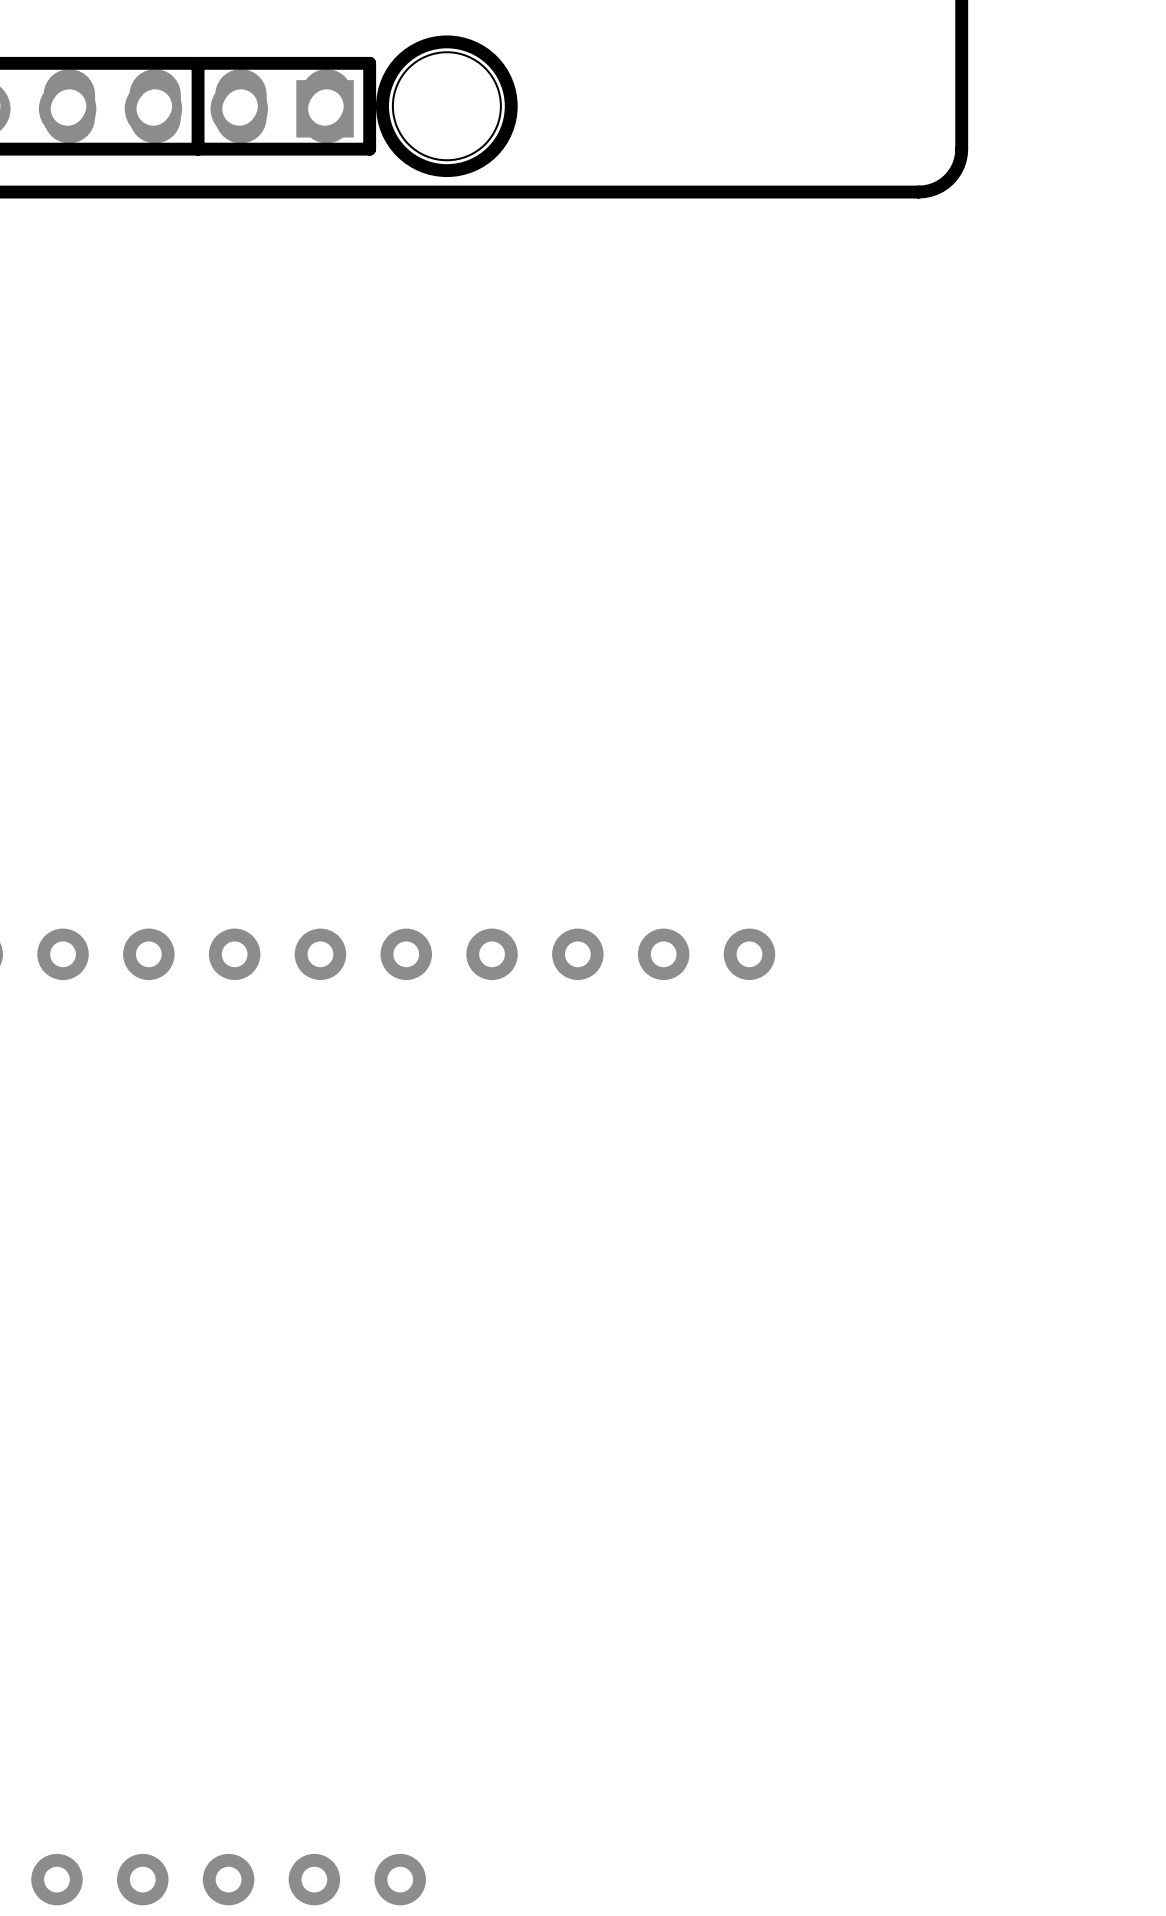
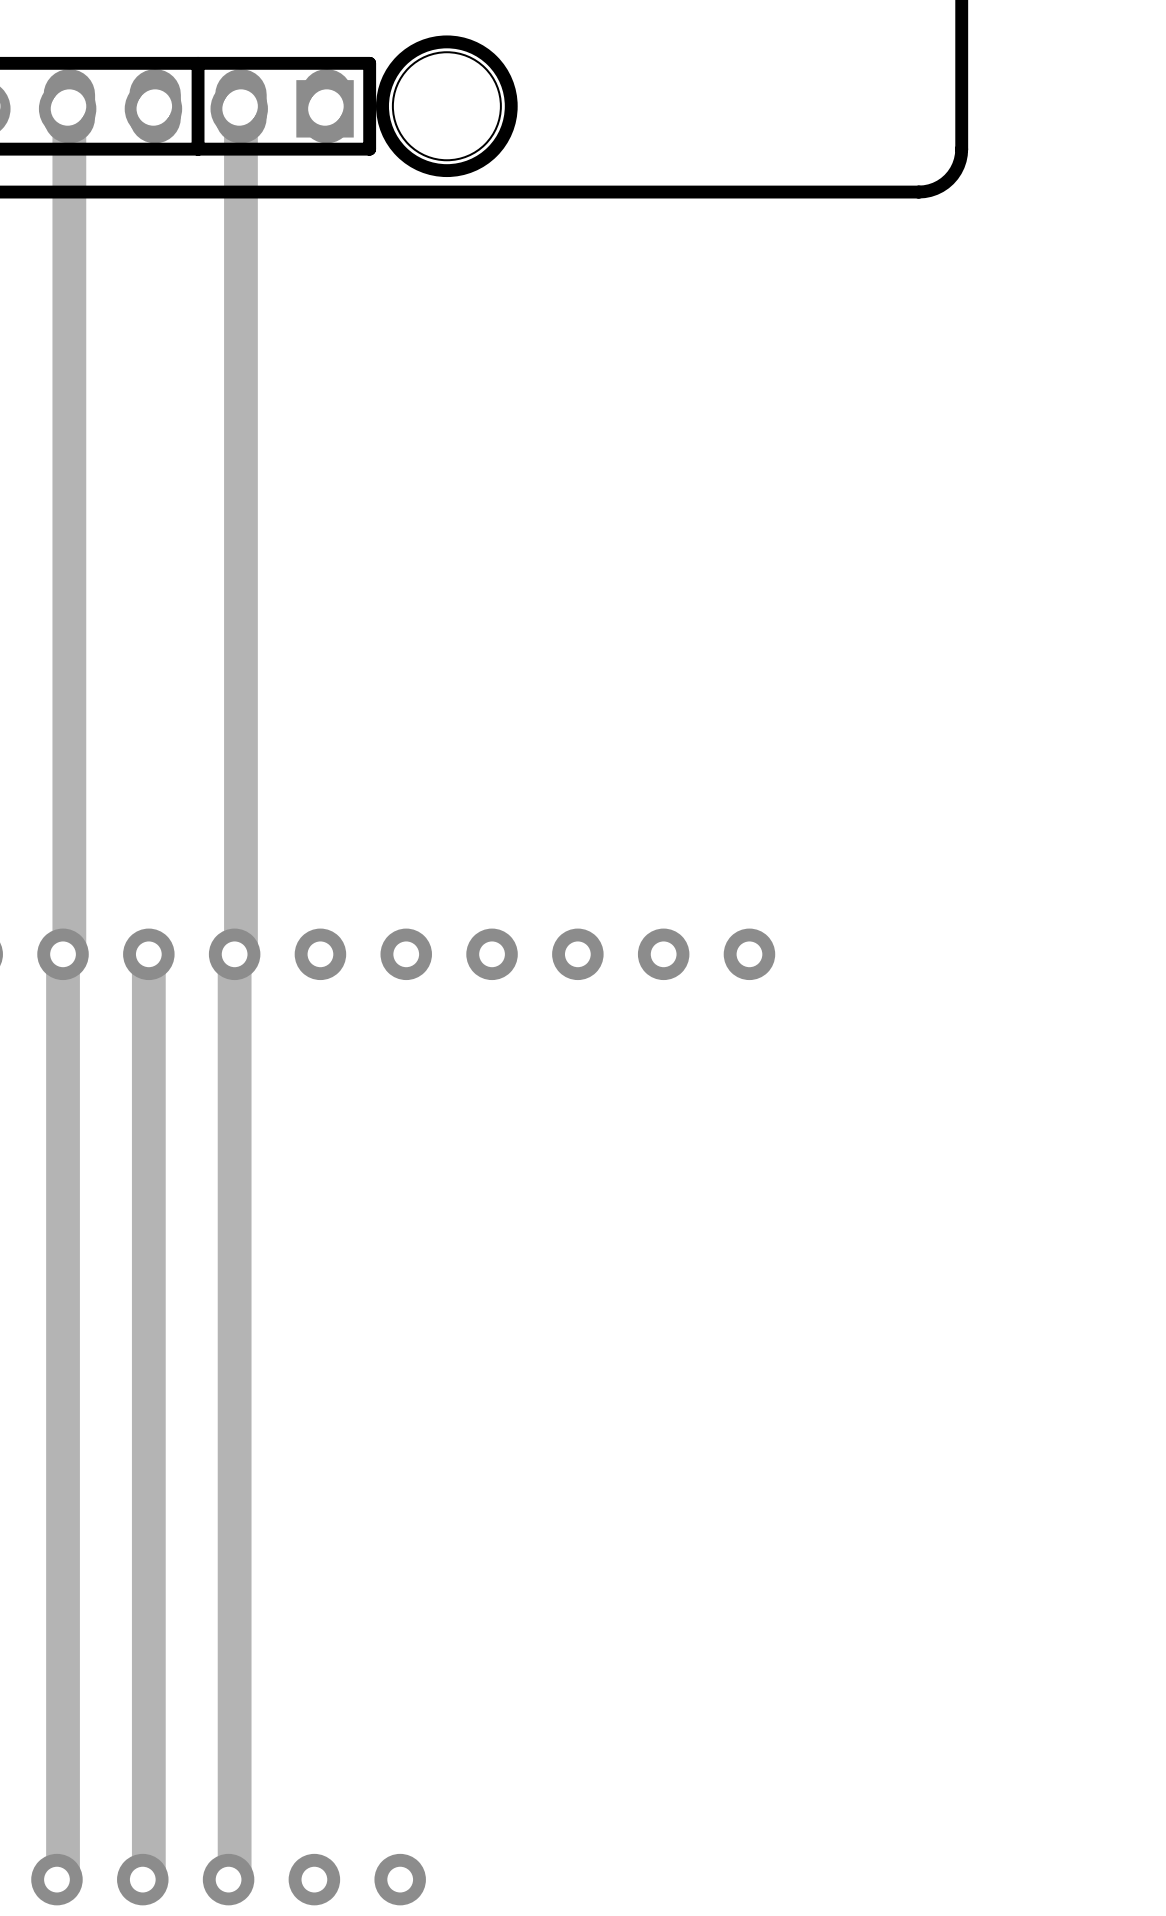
track: none -> (69, 106) (69, 947) (63, 954) (63, 1873) (56, 1879)
track: none -> (240, 106) (240, 947) (234, 954) (234, 1873) (228, 1879)
track: none -> (148, 954) (148, 1873) (142, 1879)

